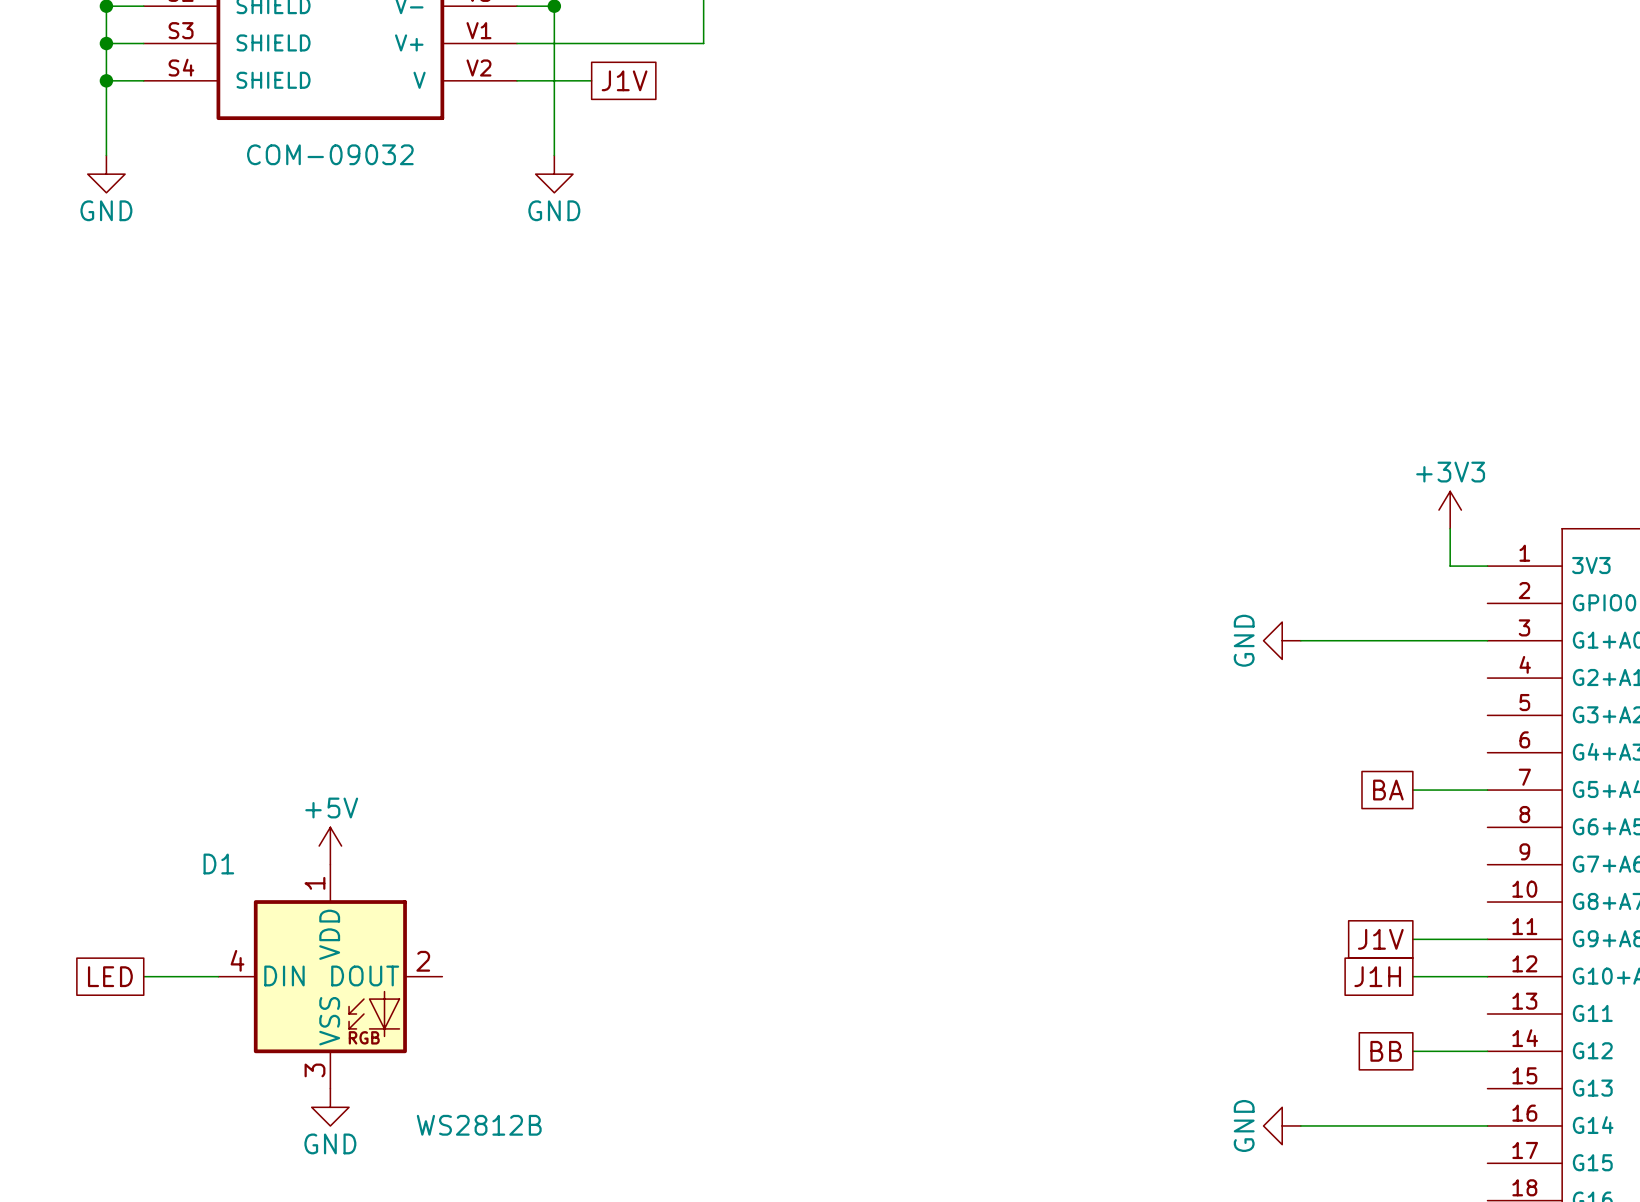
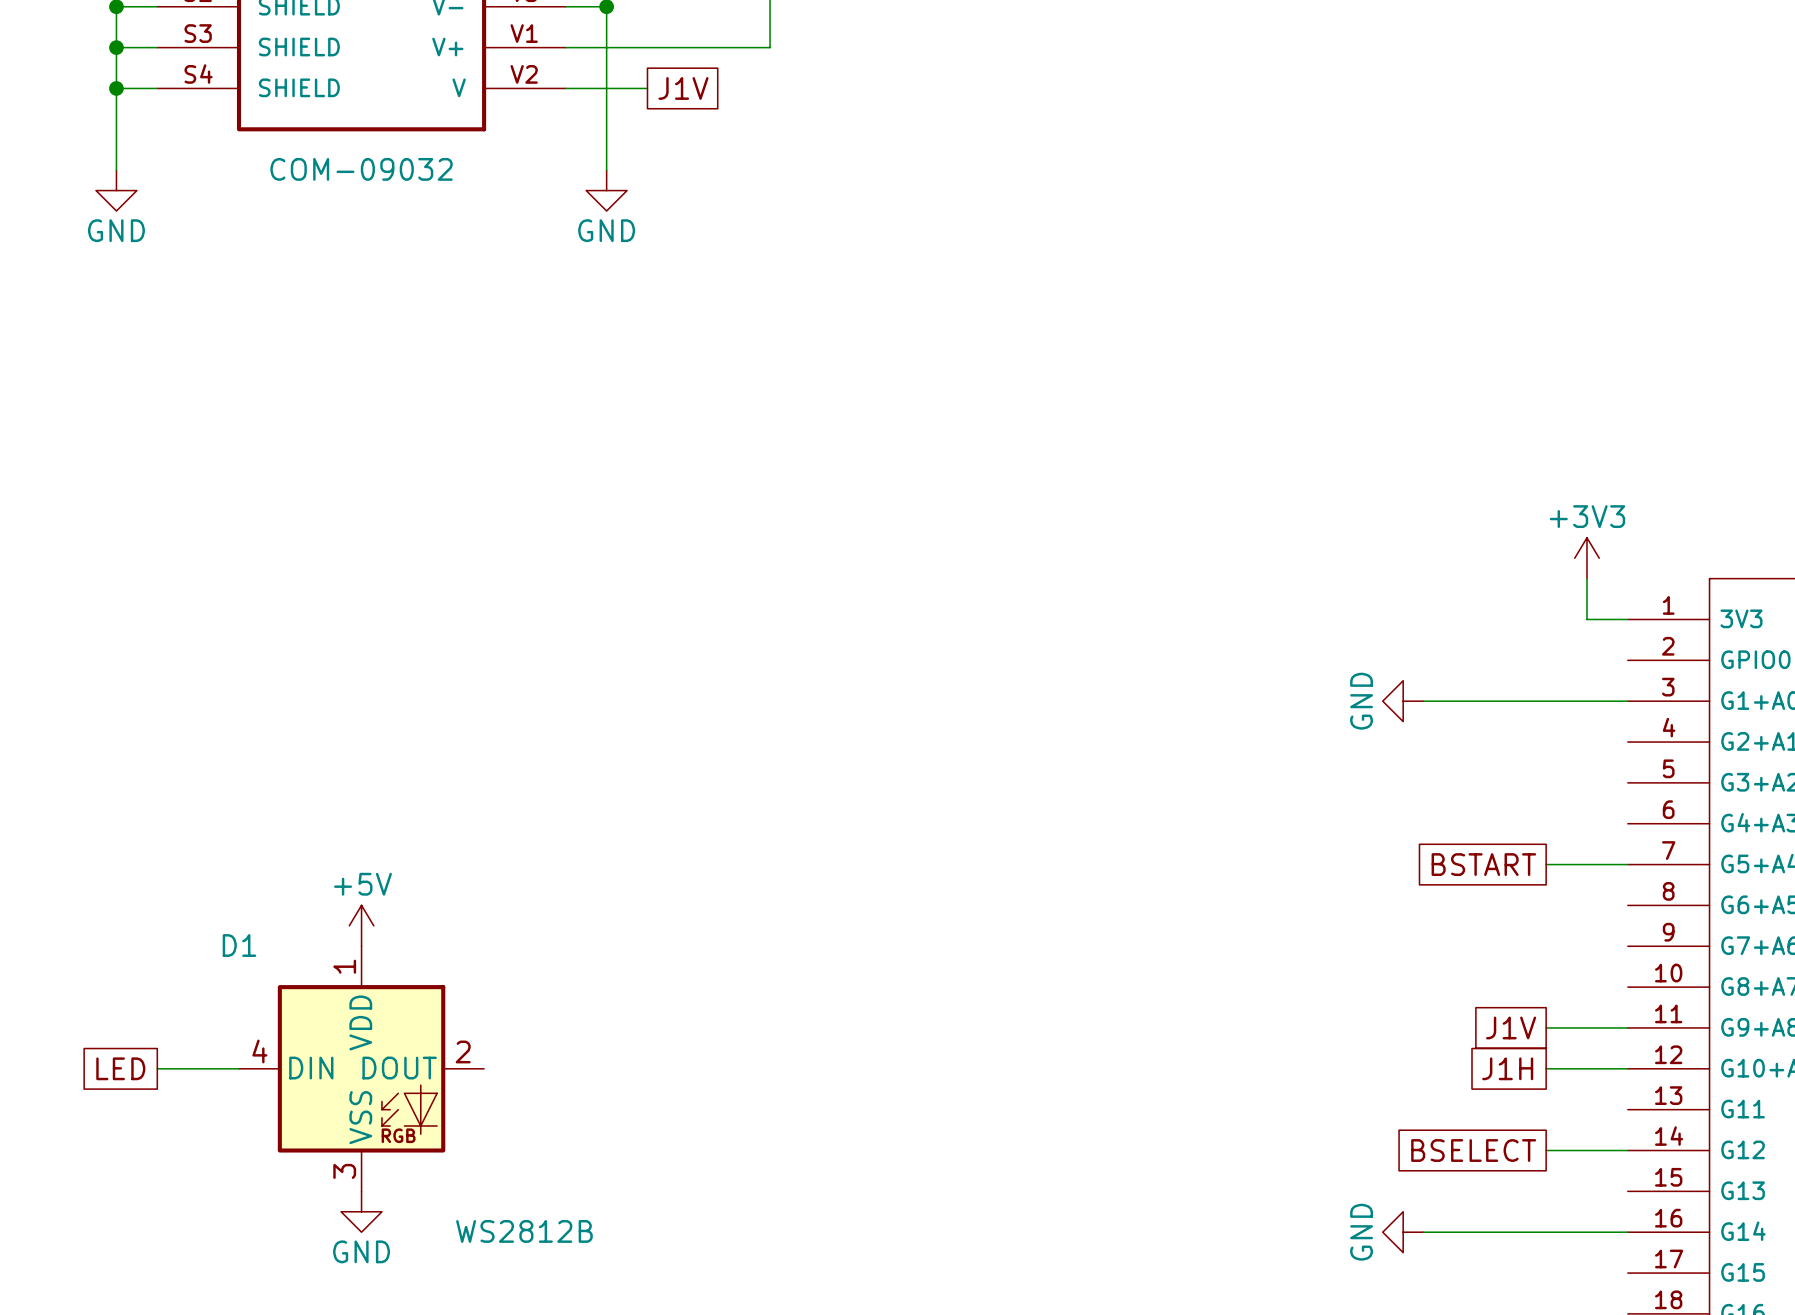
global label: BA (1388, 790) -> BSTART (1483, 864)
global label: BB (1386, 1051) -> BSELECT (1473, 1150)

